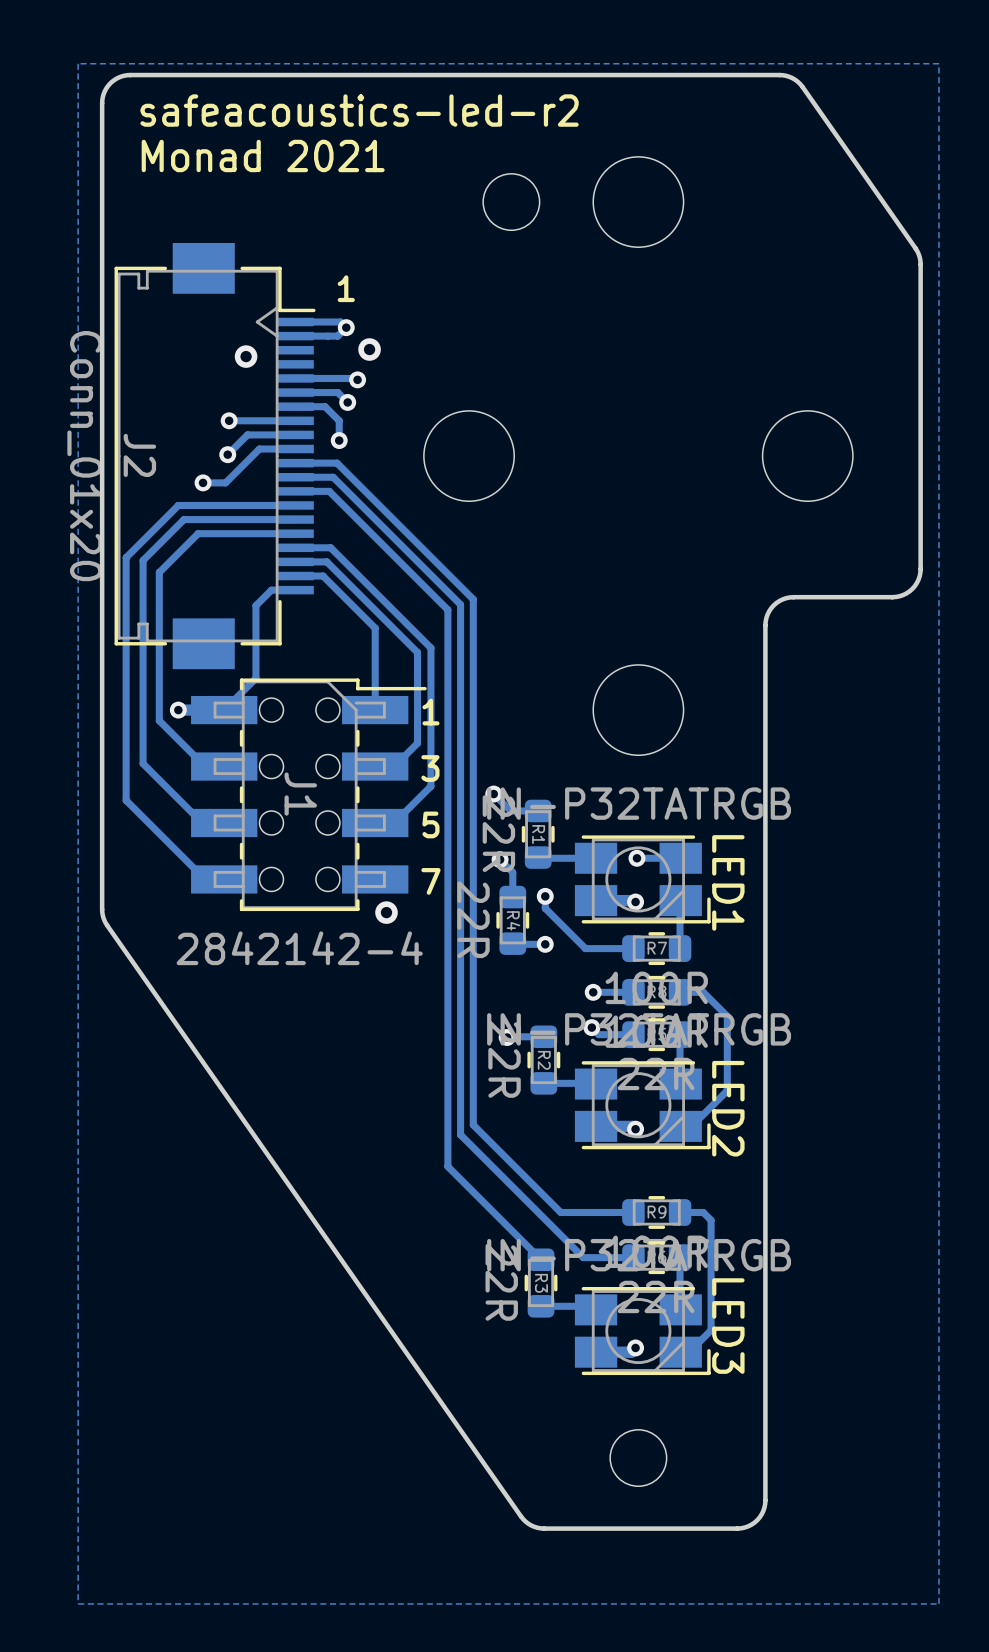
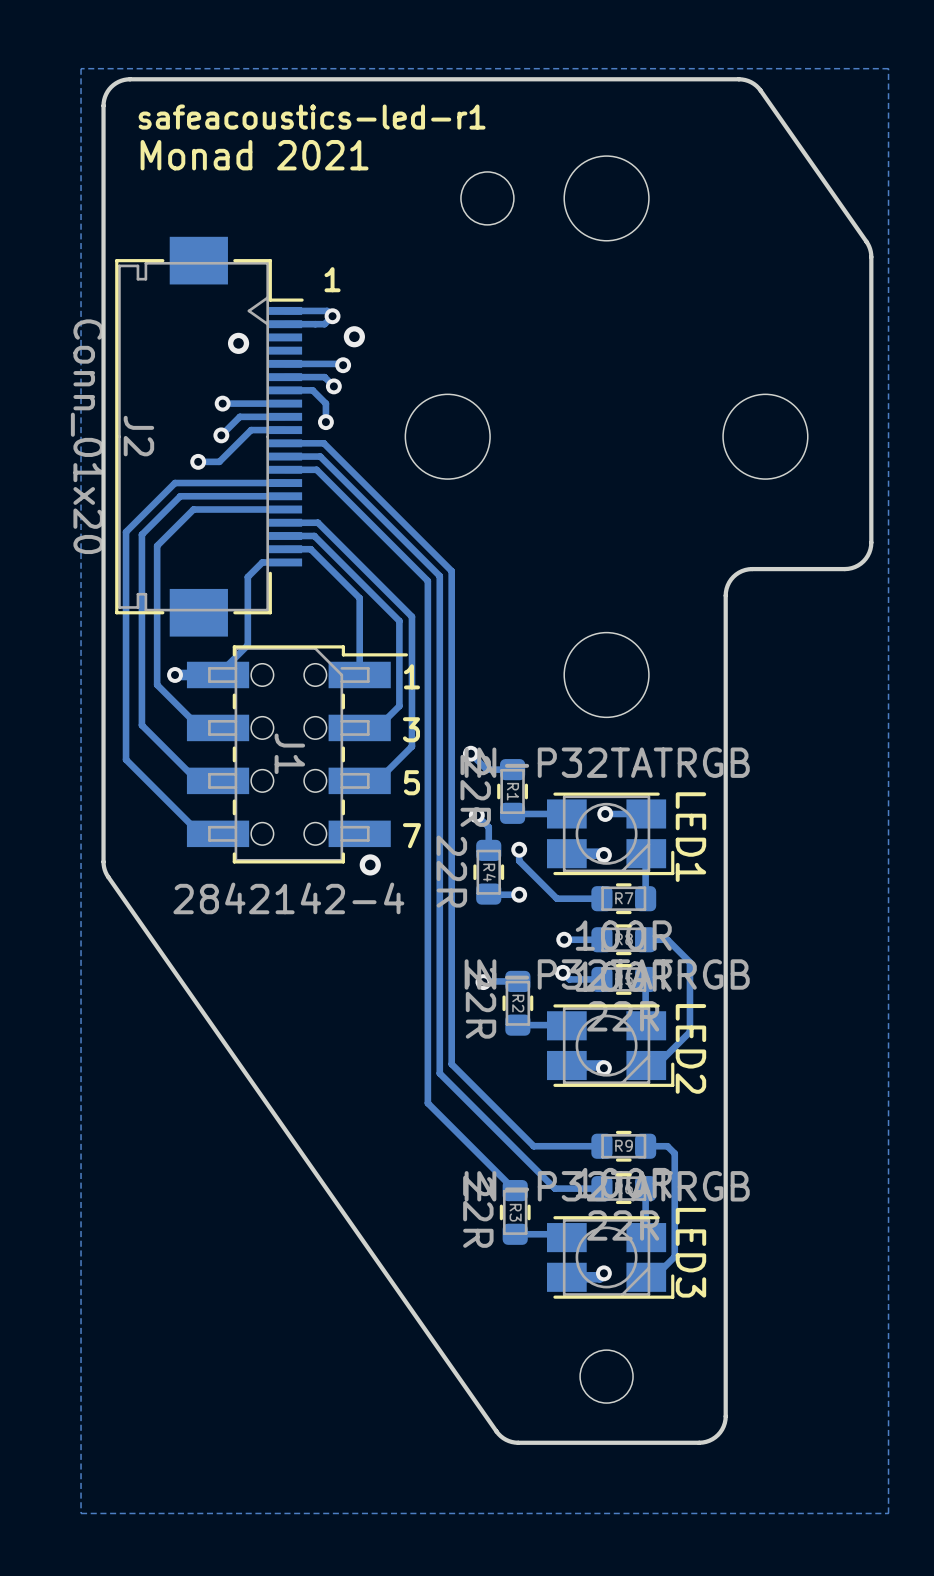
text: safeacoustics-led-r2 (359, 110) -> safeacoustics-led-r1 (312, 117)

